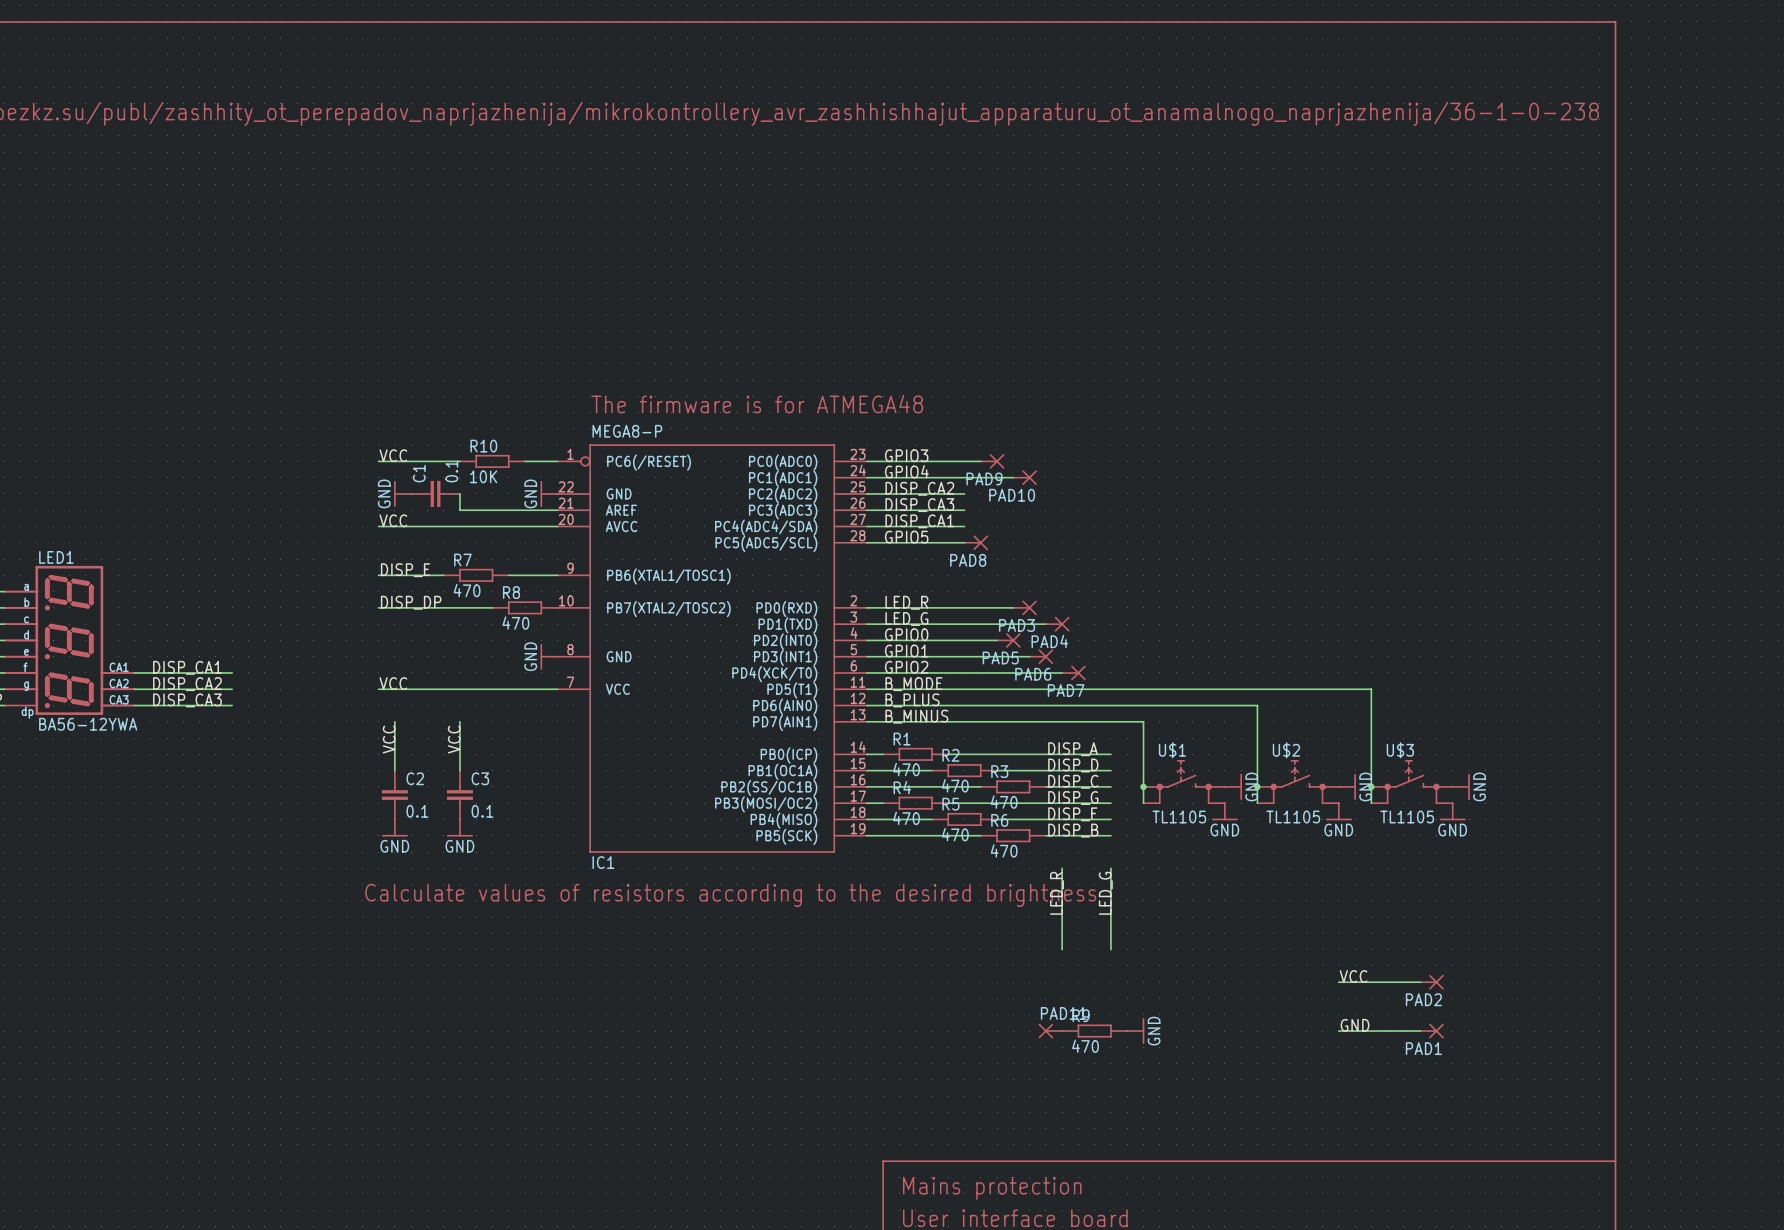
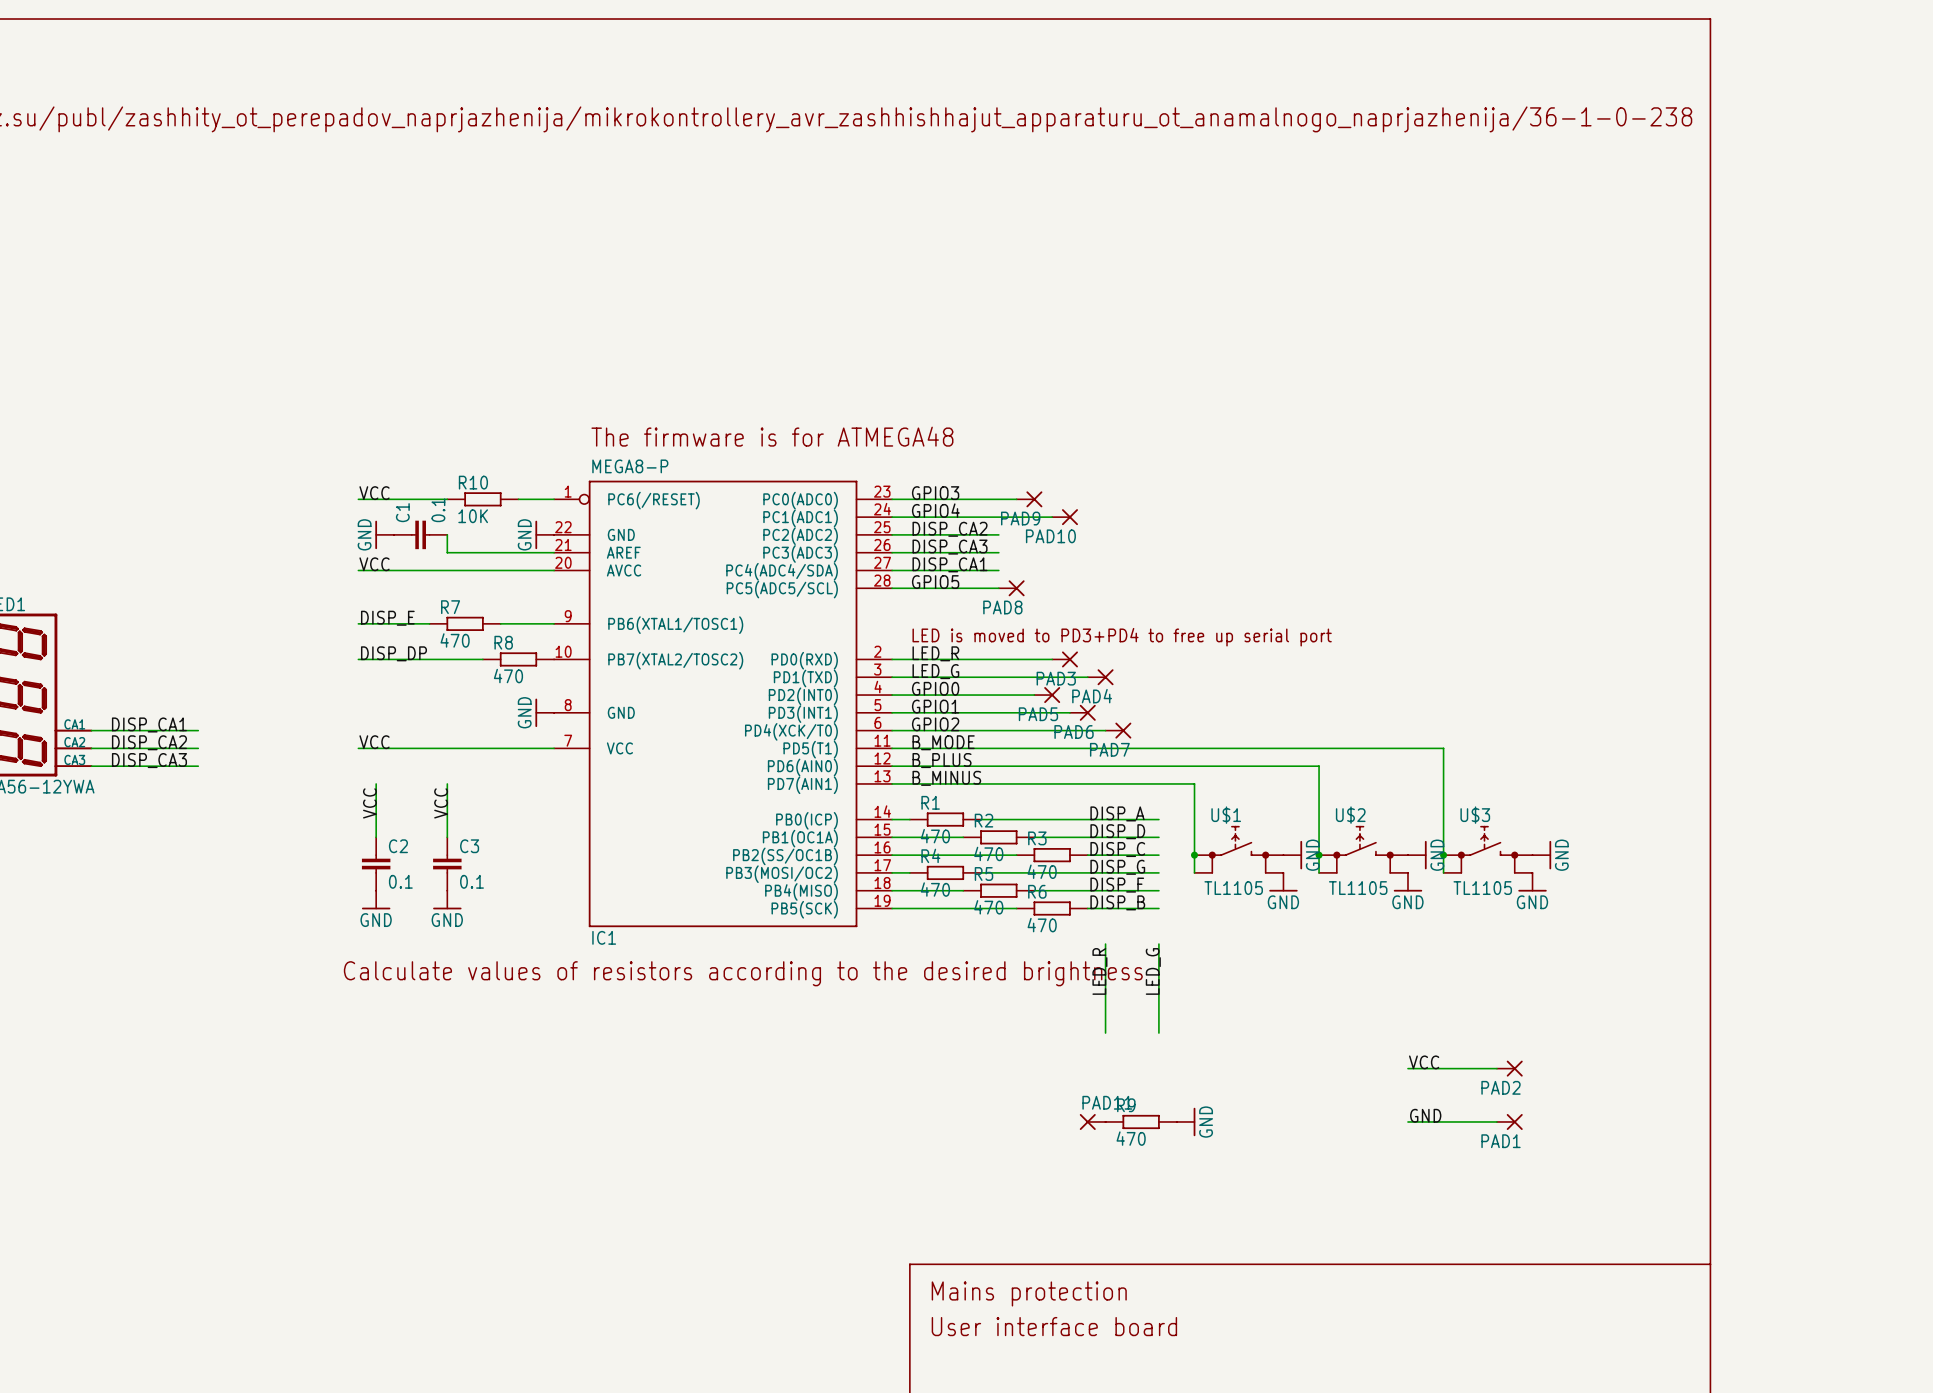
text: none -> LED is moved to PD3+PD4 to free up serial port (1122, 637)

